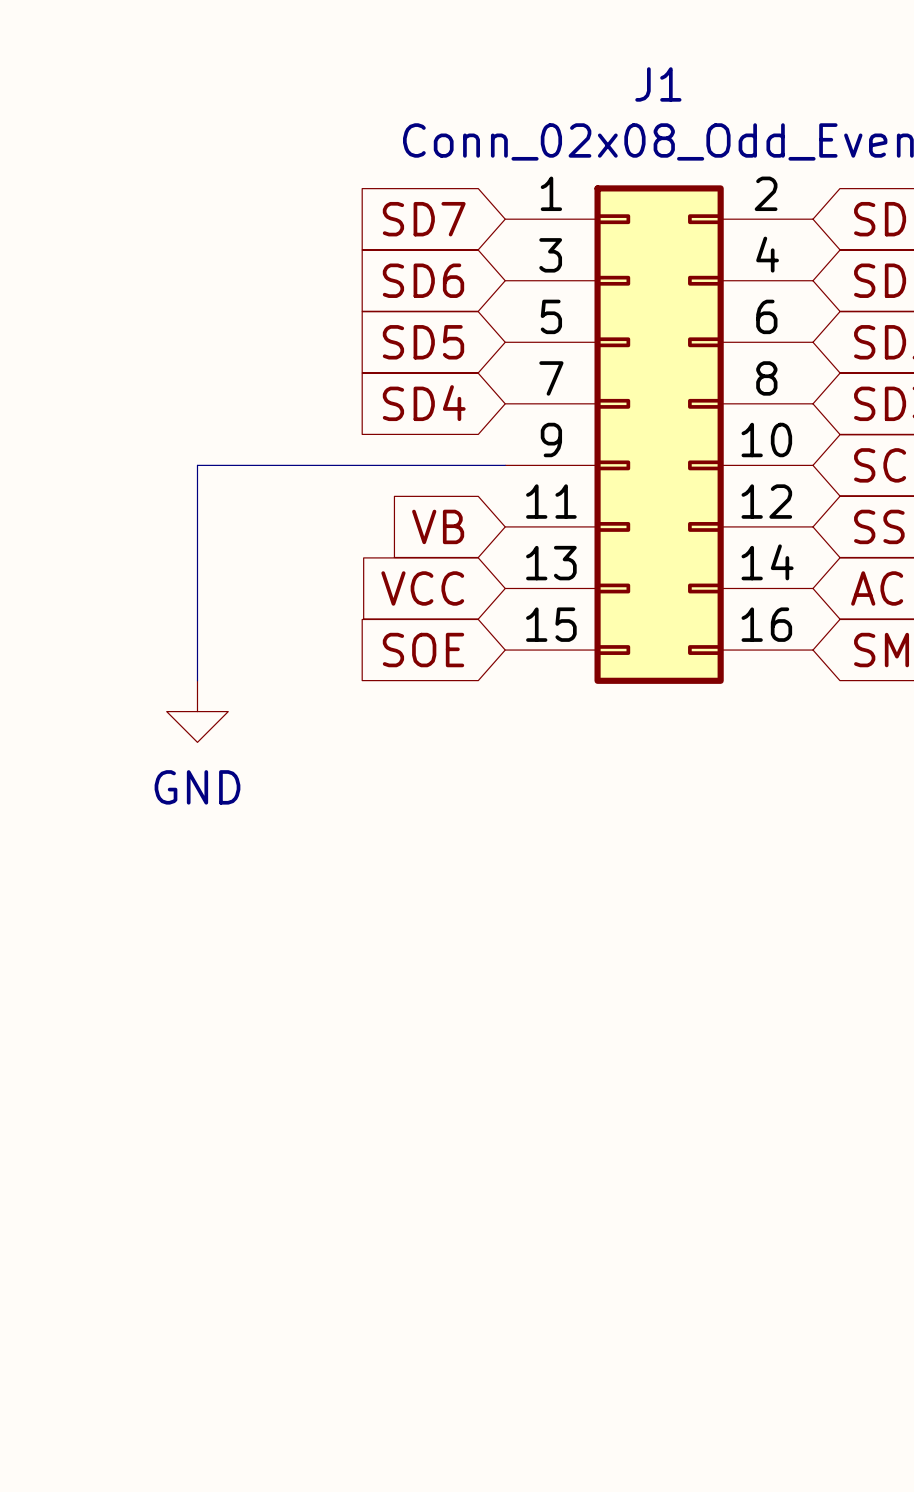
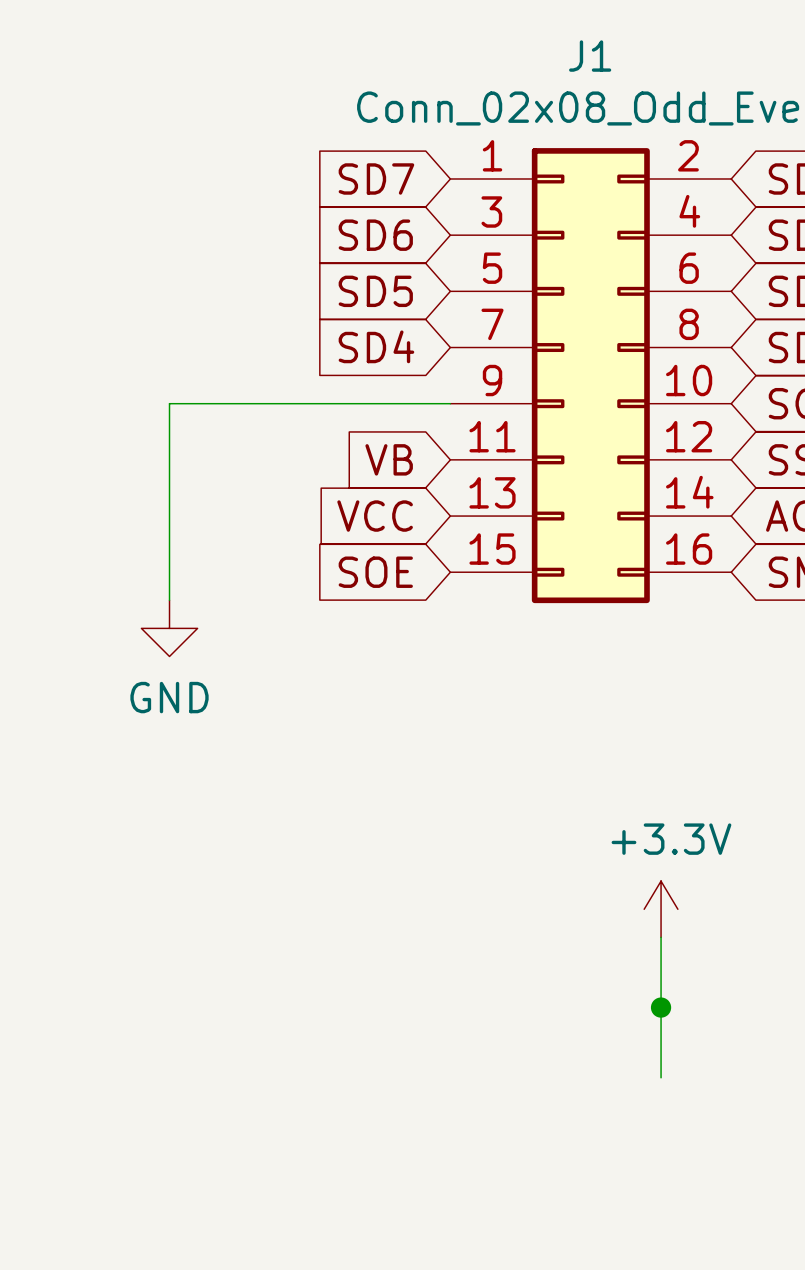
power symbol: none -> +3.3V (661, 909)
wire: none -> (661, 937) (661, 1077)
junction: none -> (661, 1007)

